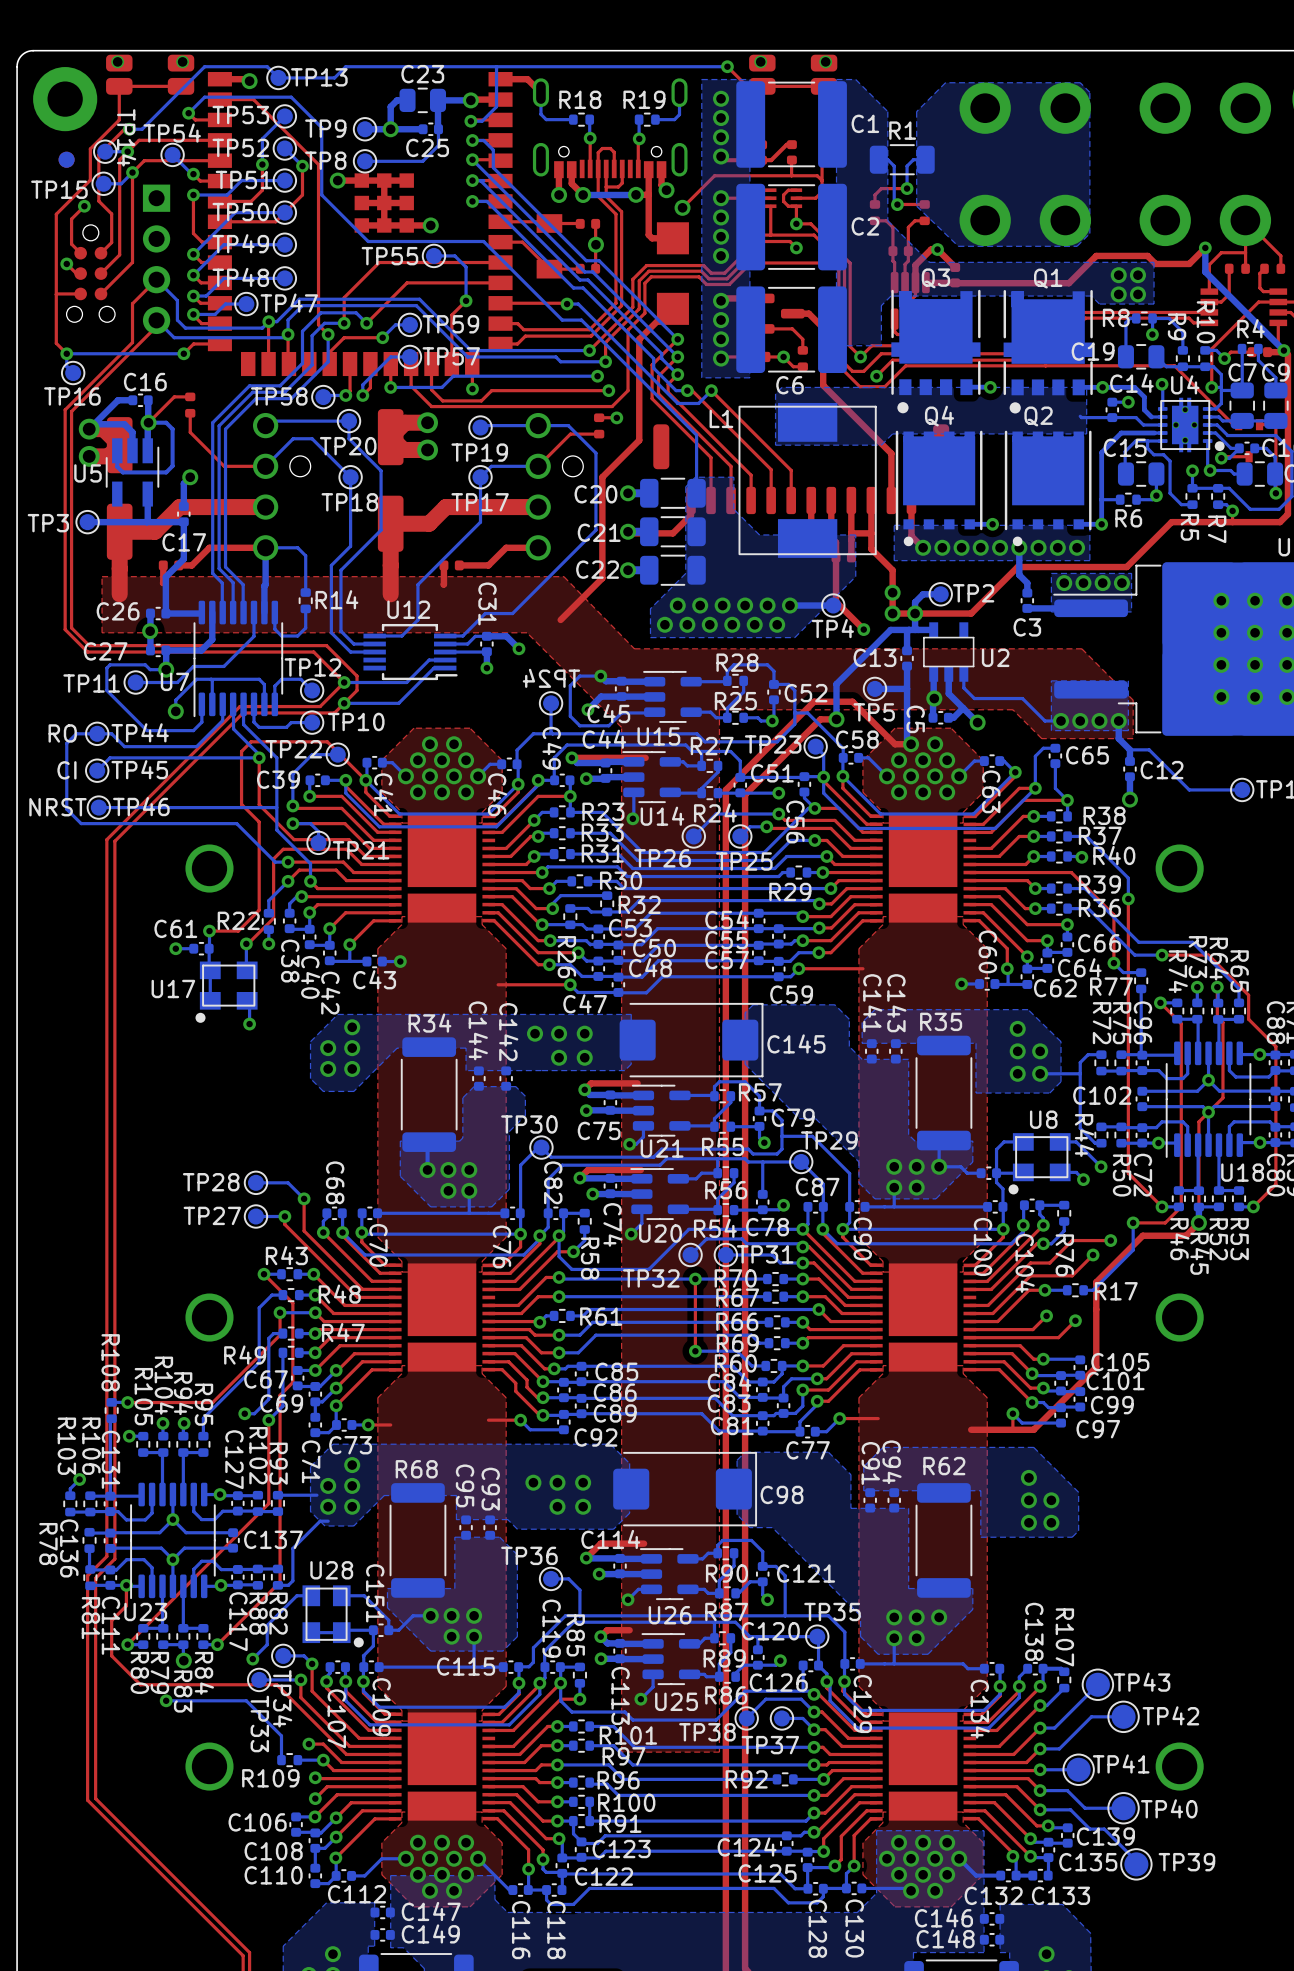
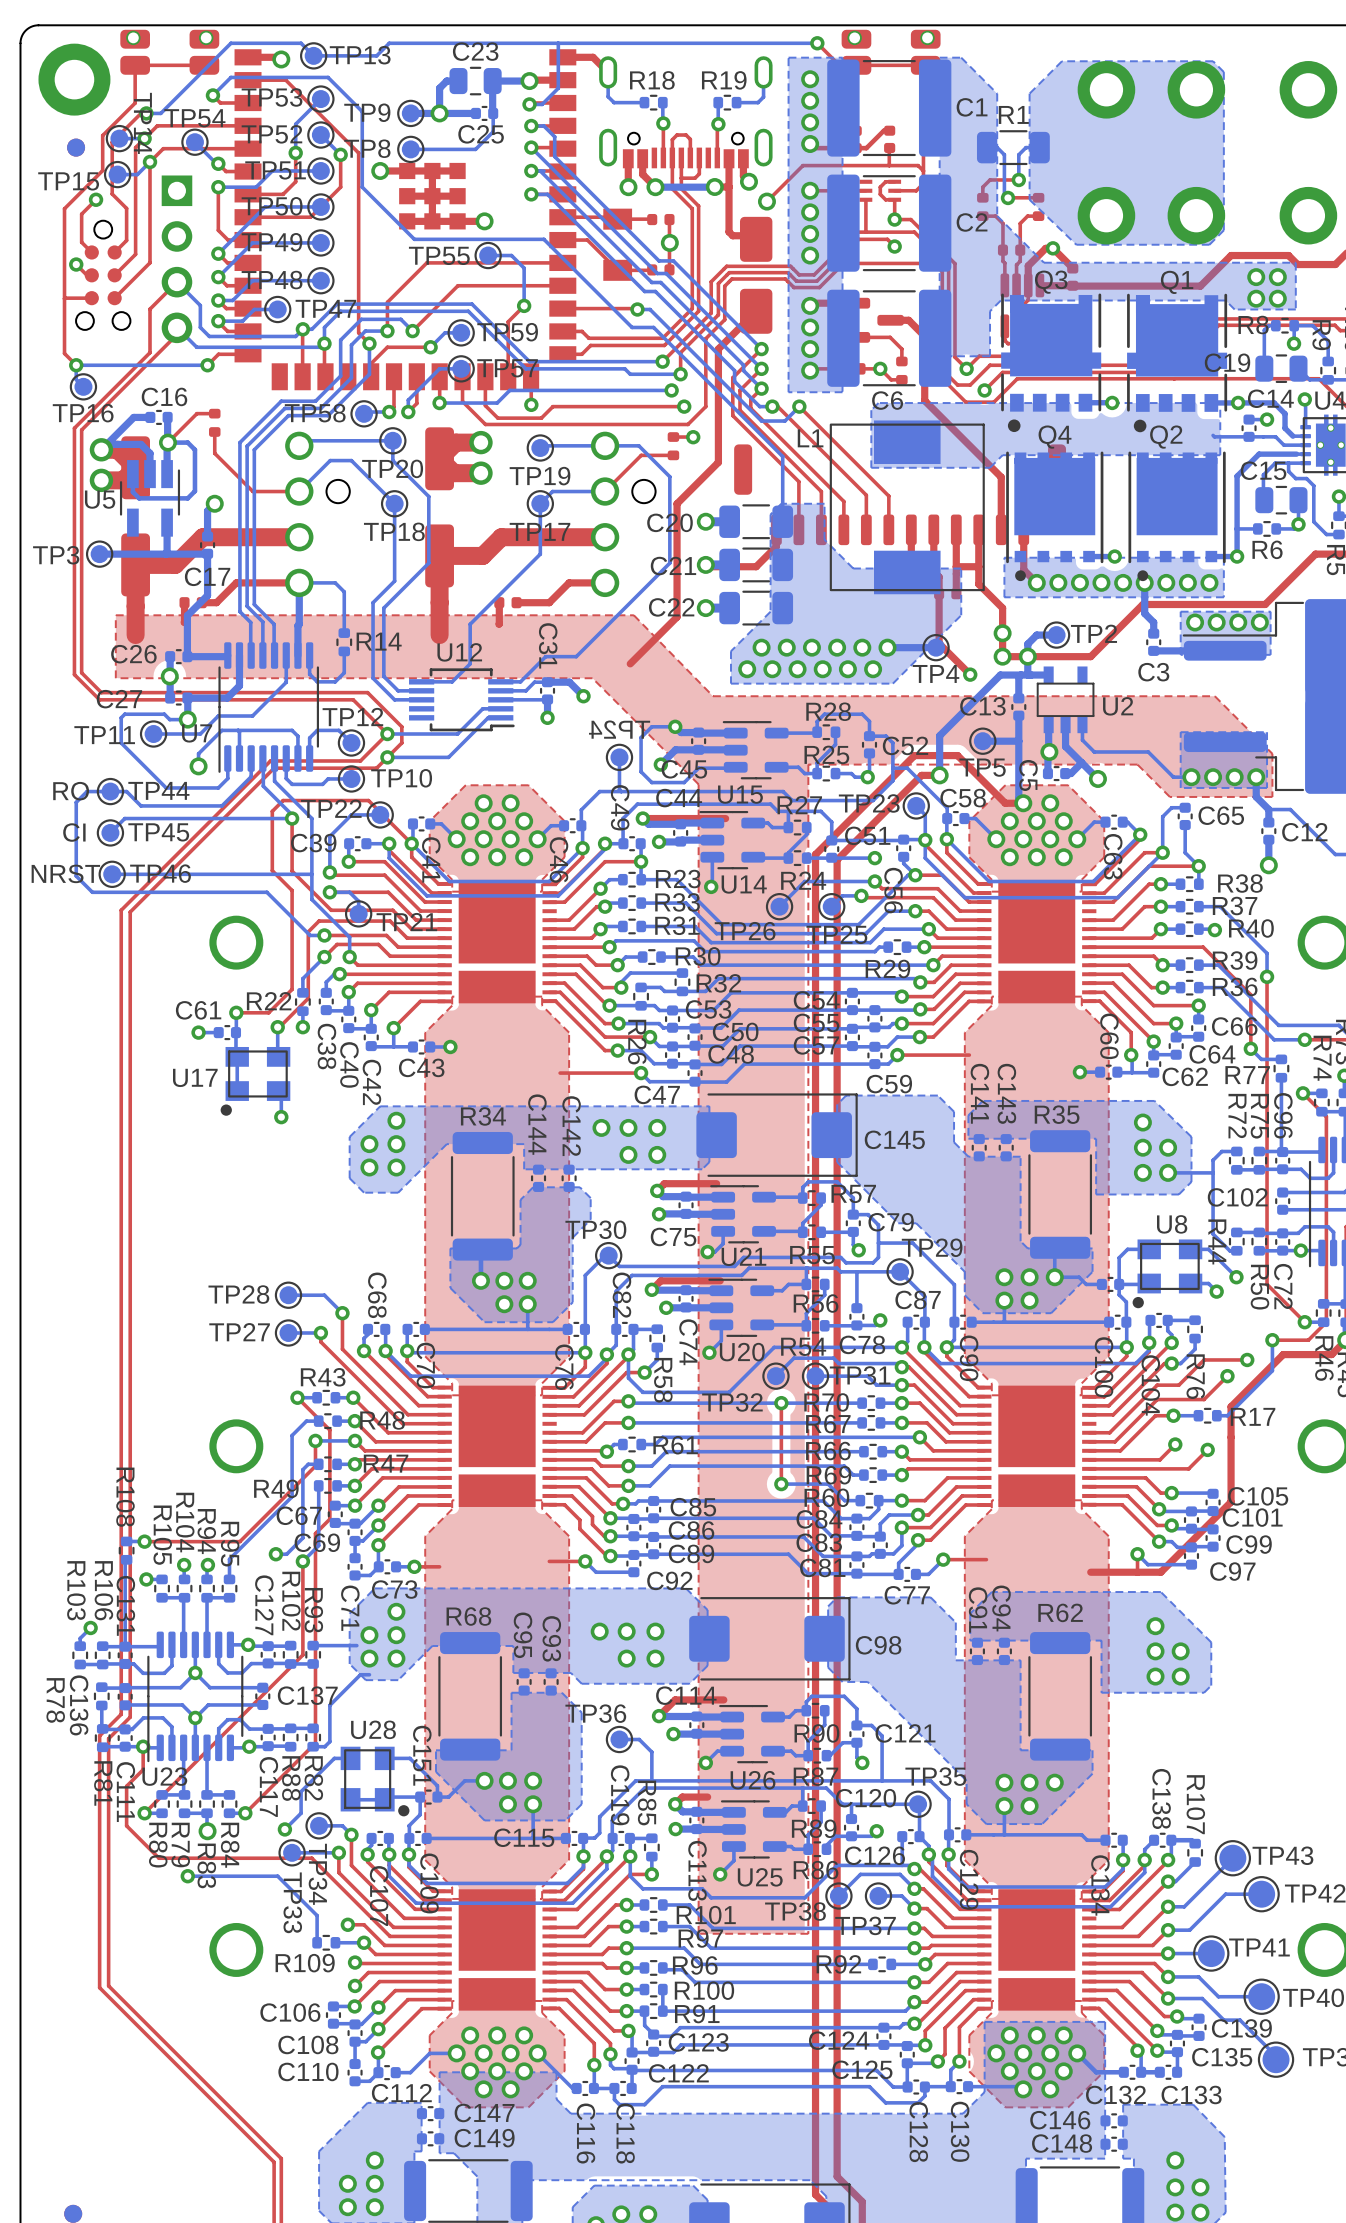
part footprint: [656, 222, 689, 325] -> [739, 216, 773, 334]

